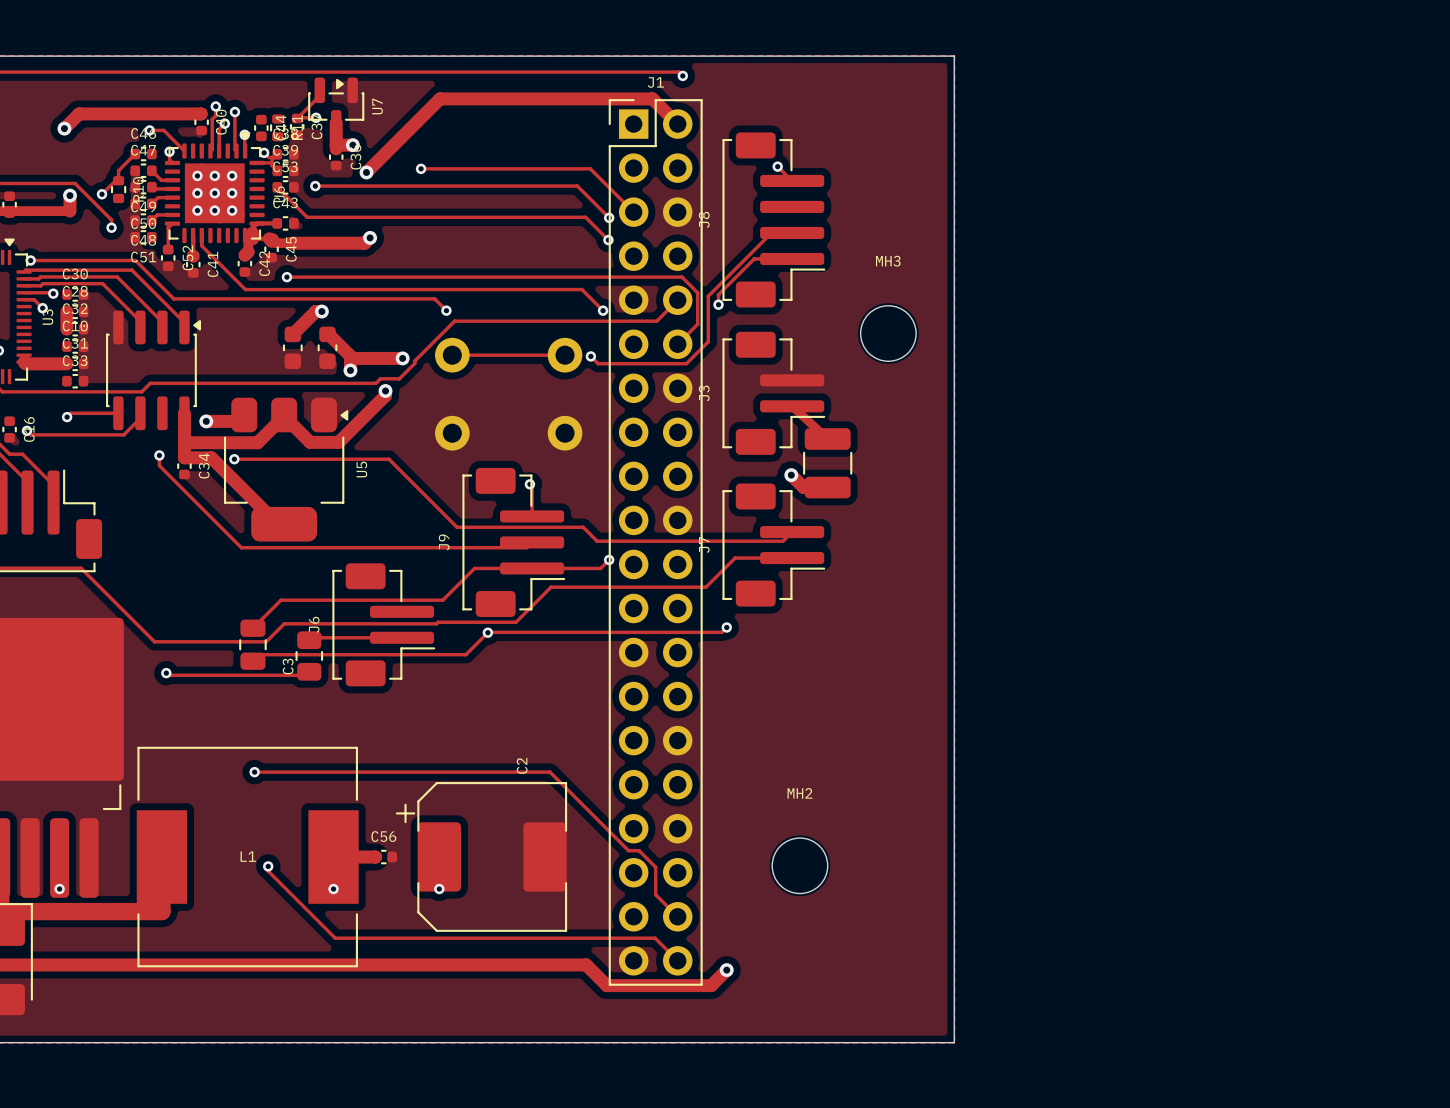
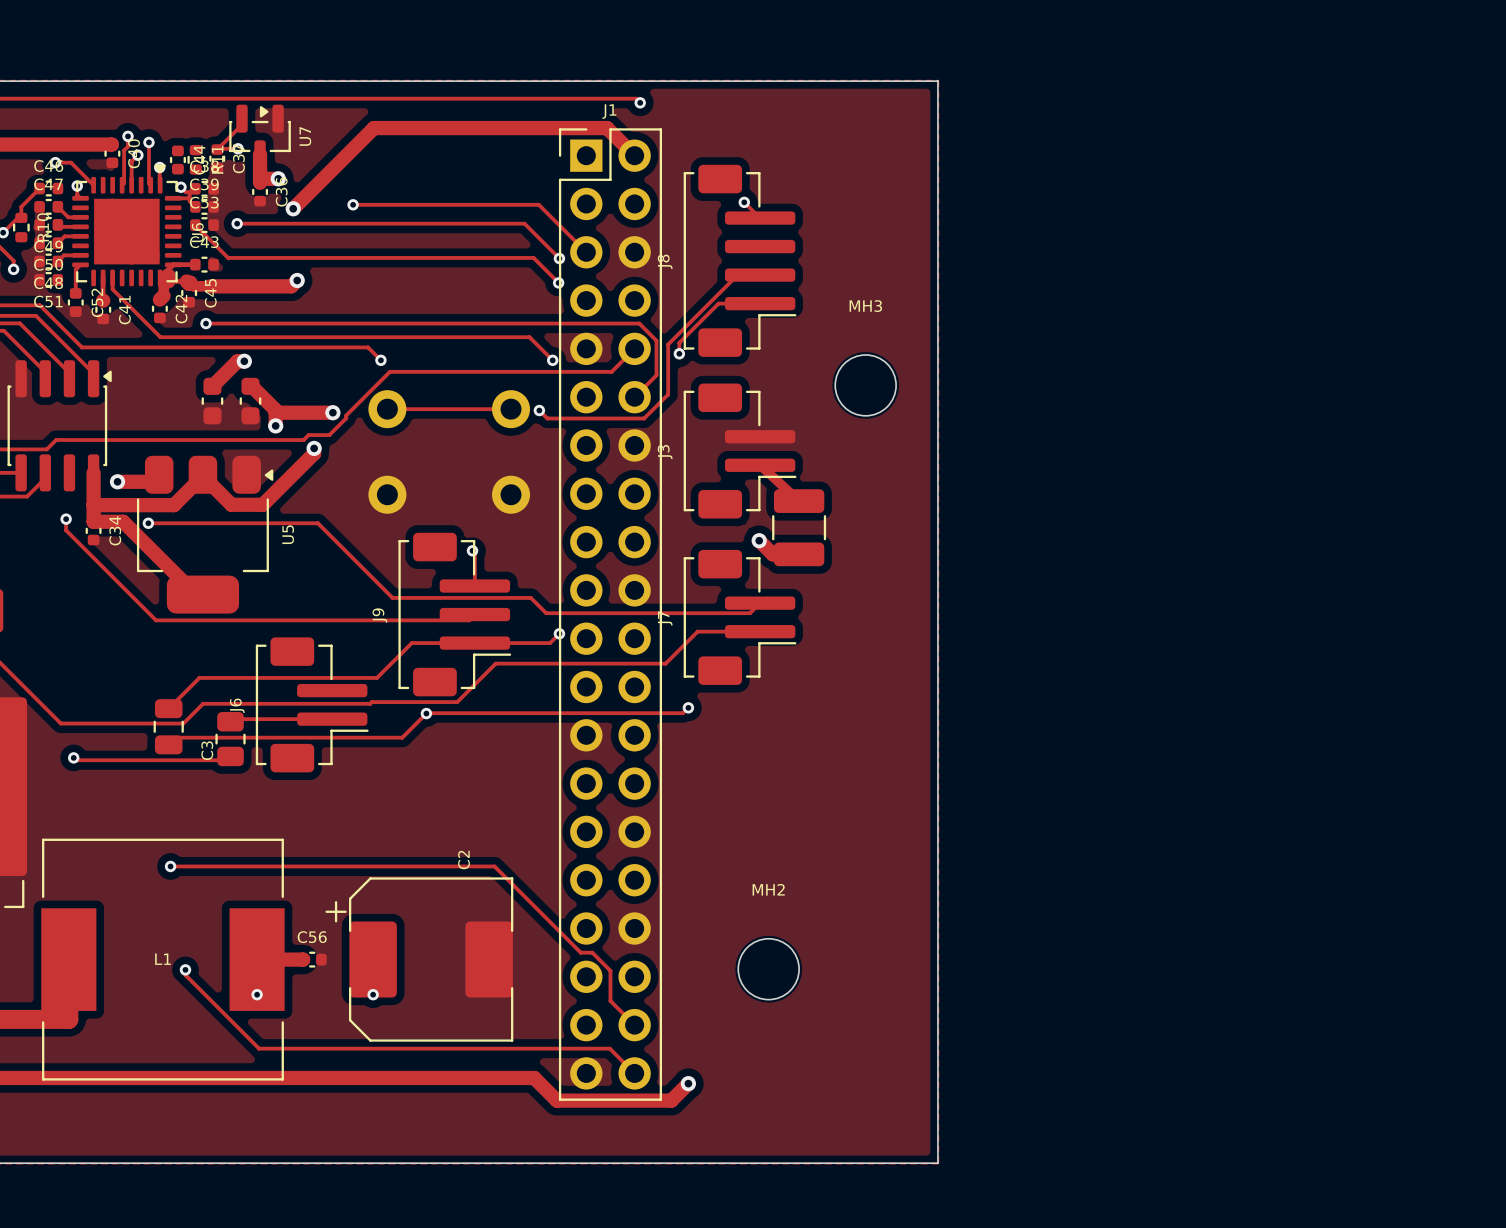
via: (197, 175) -> none
via: (214, 175) -> none
via: (232, 175) -> none
via: (197, 193) -> none
via: (214, 193) -> none
via: (232, 193) -> none
via: (197, 210) -> none
via: (214, 210) -> none
via: (232, 210) -> none

